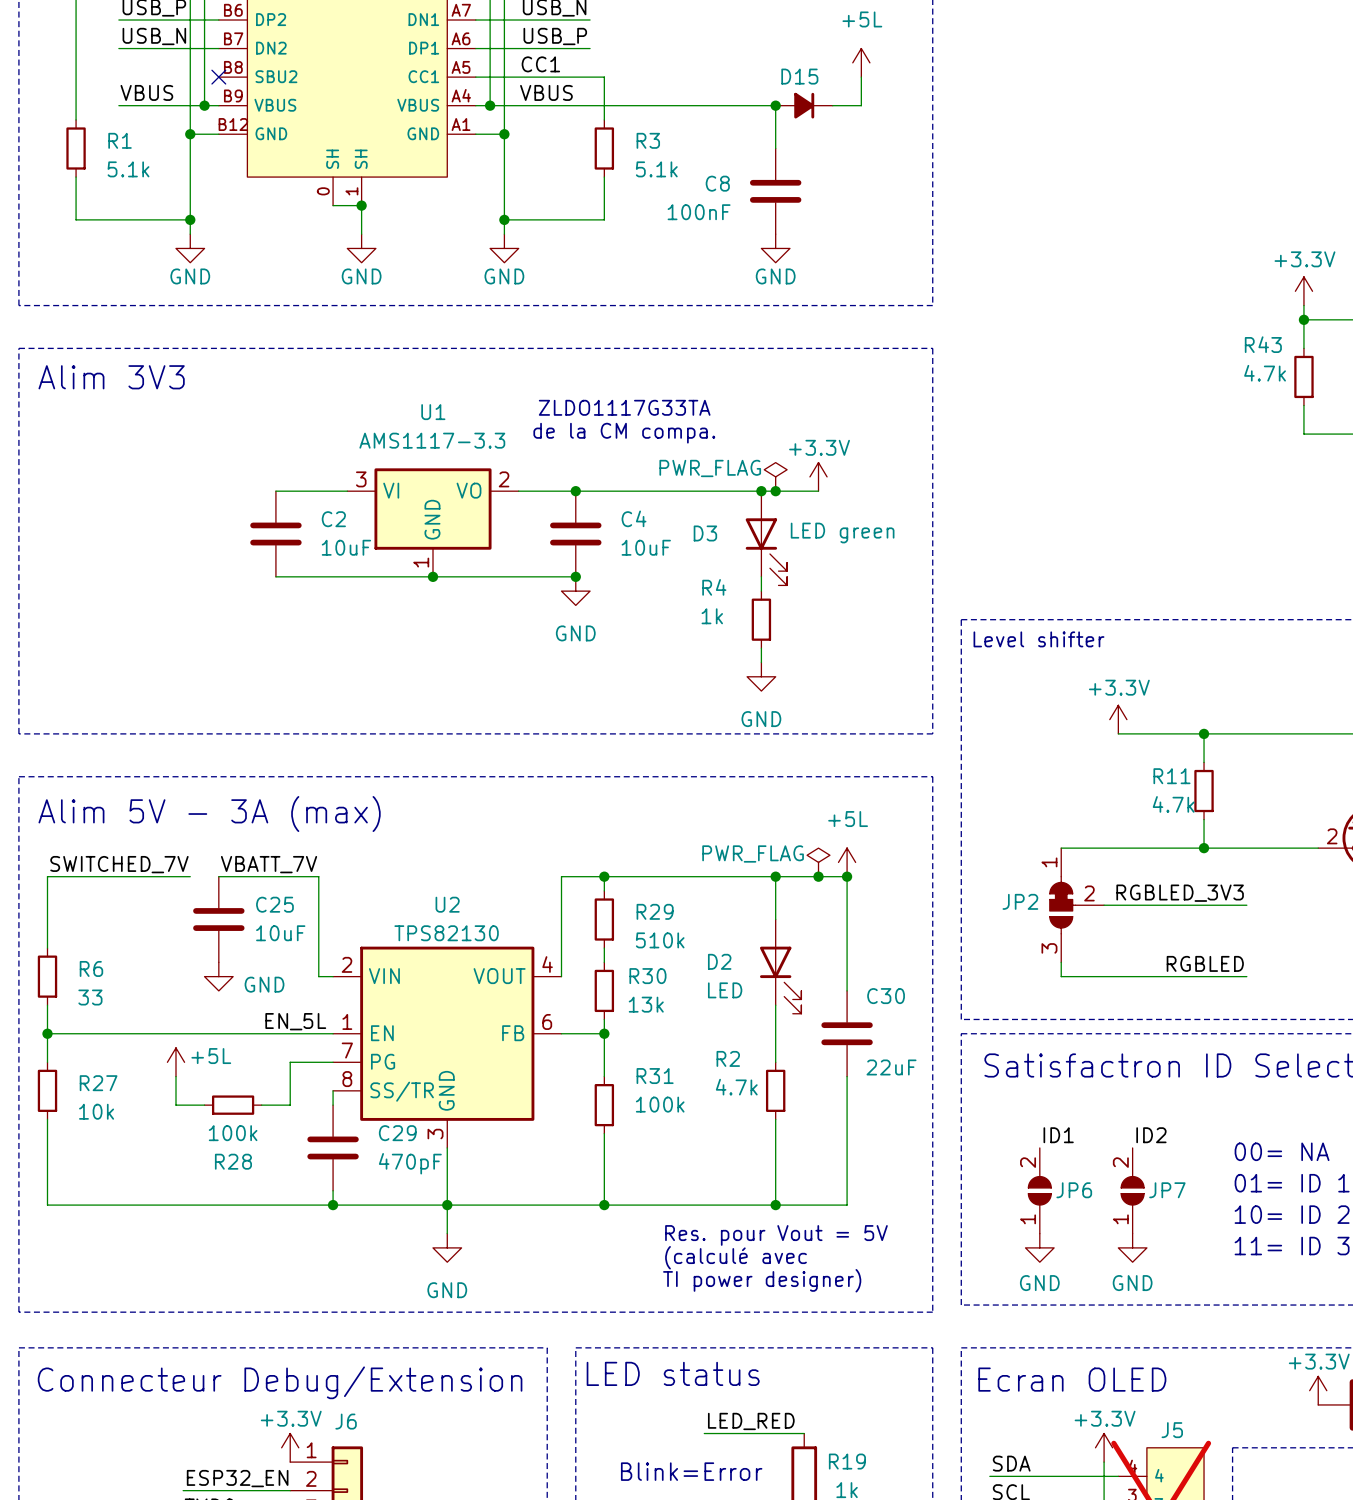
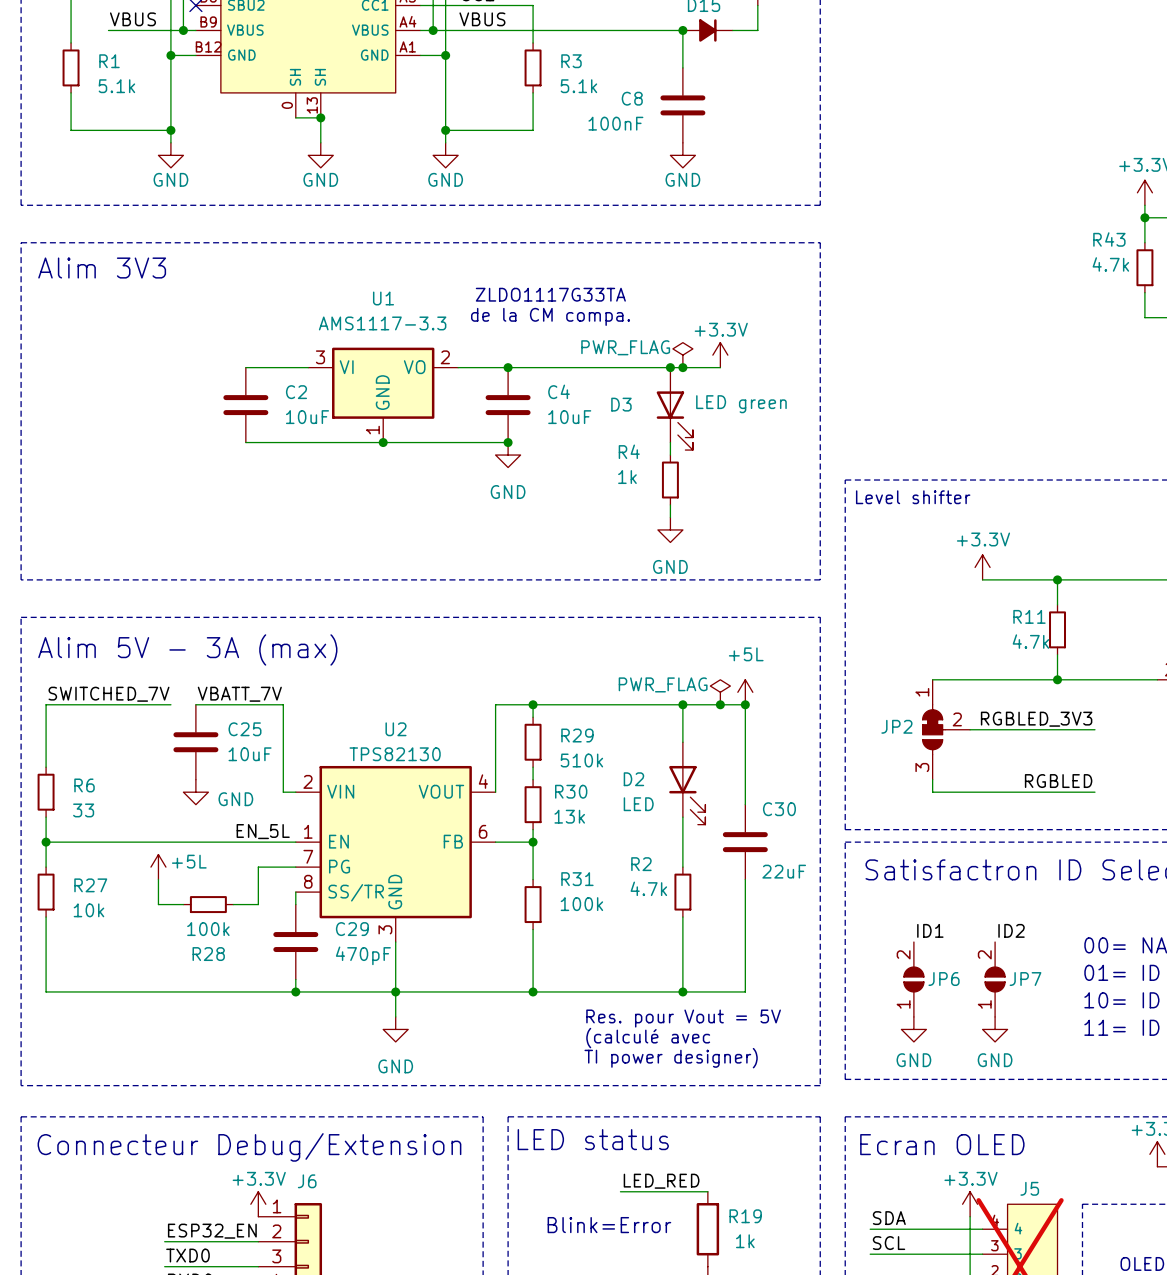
part pin number: 1 (351, 191) -> 13 (312, 105)

